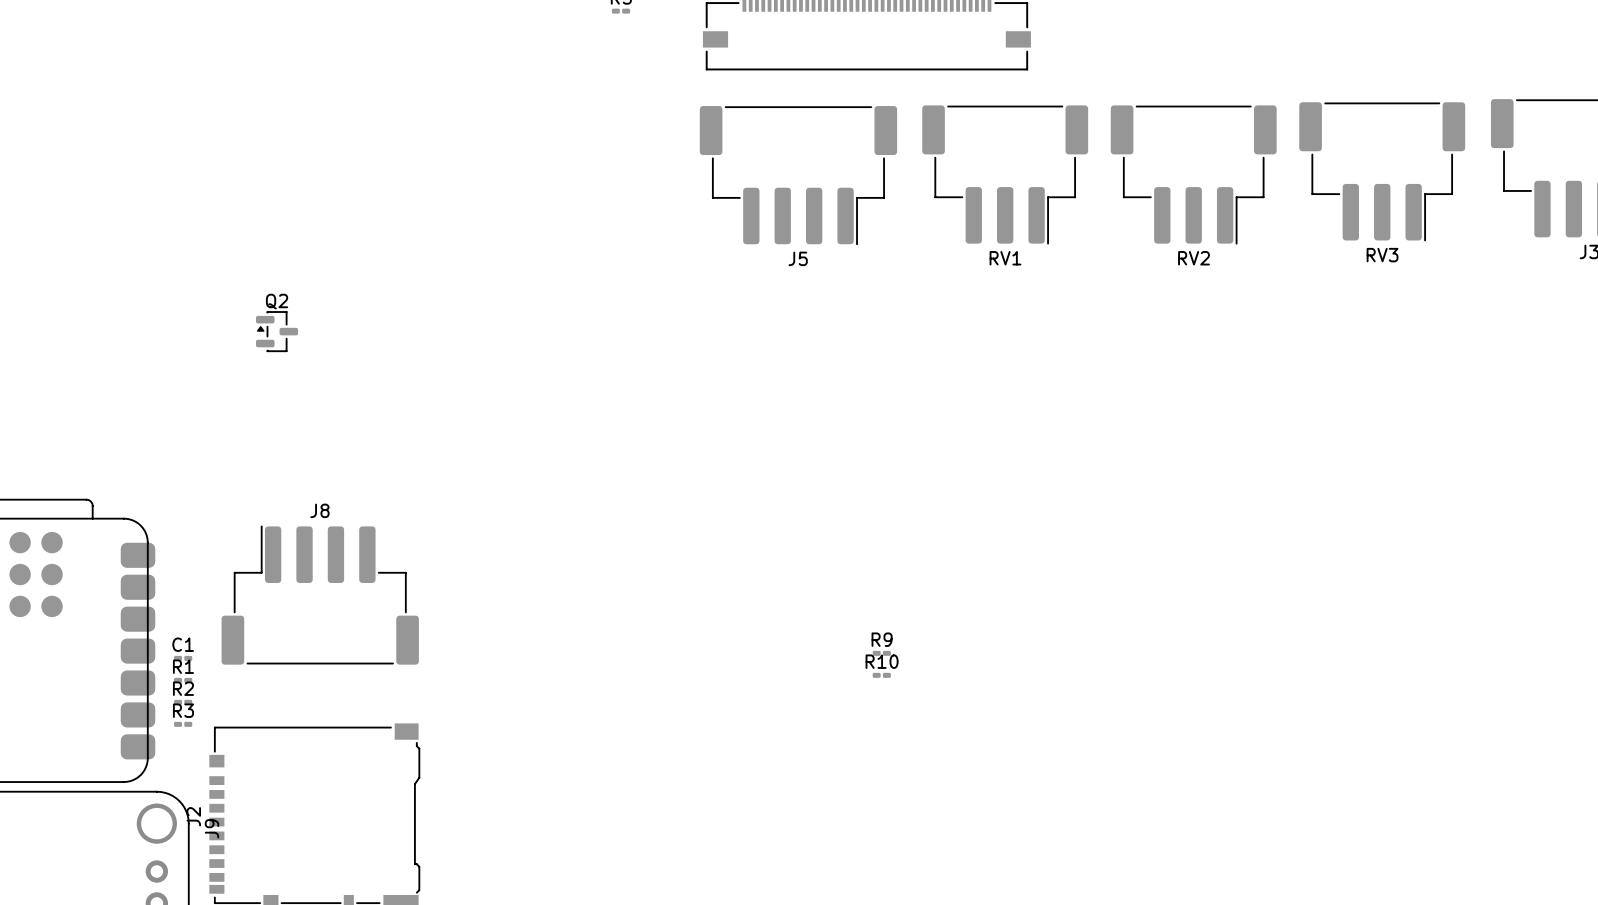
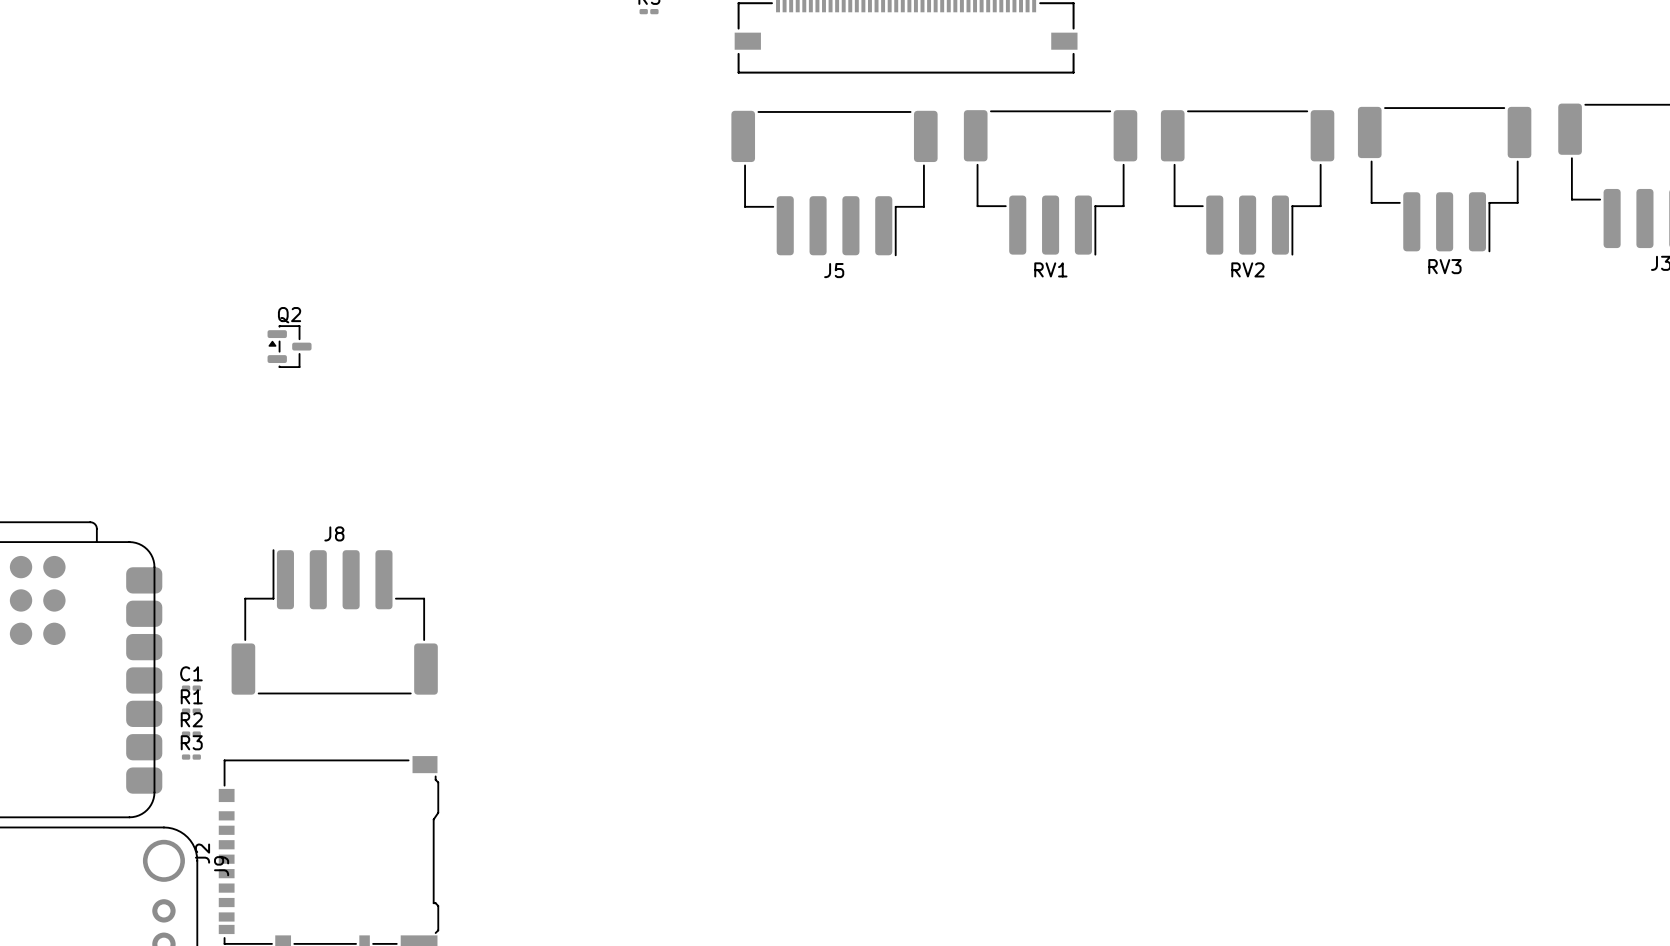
R9: (881, 653) -> none
R10: (881, 675) -> none

